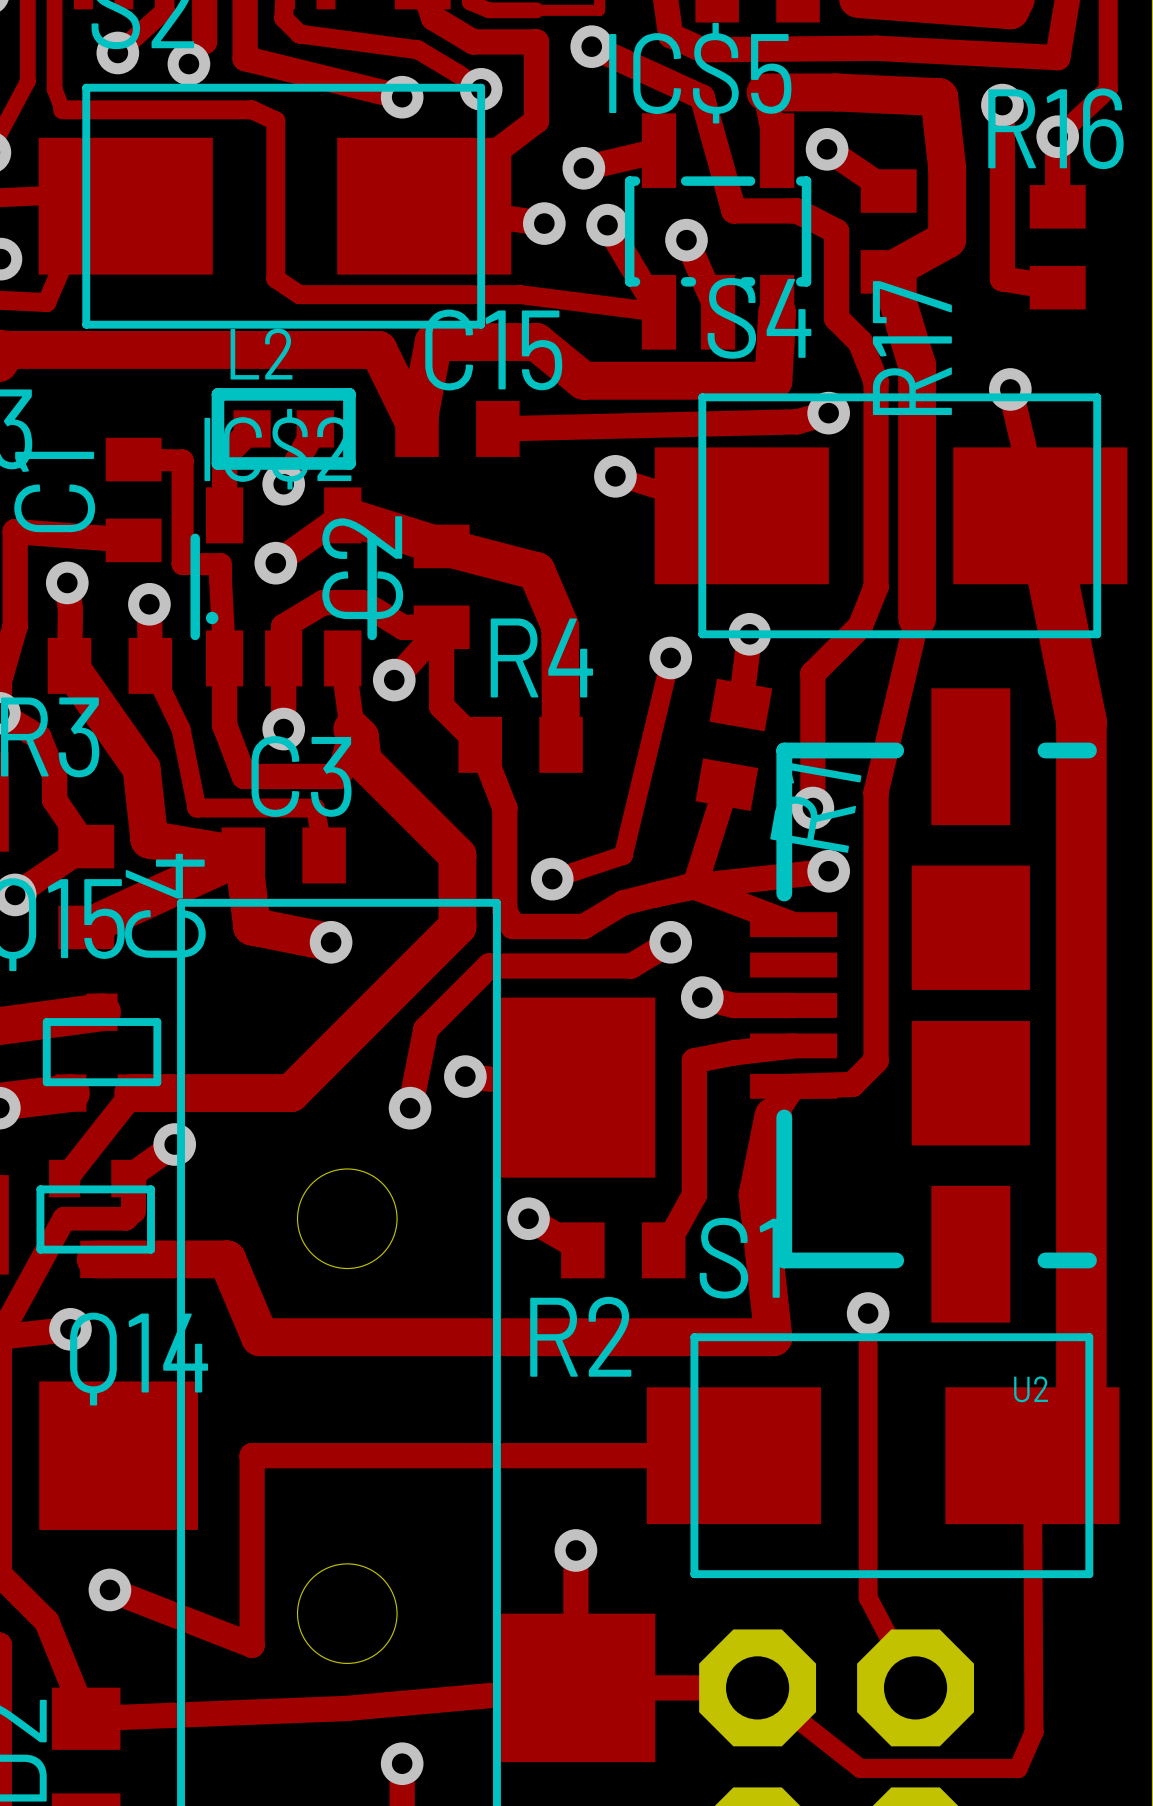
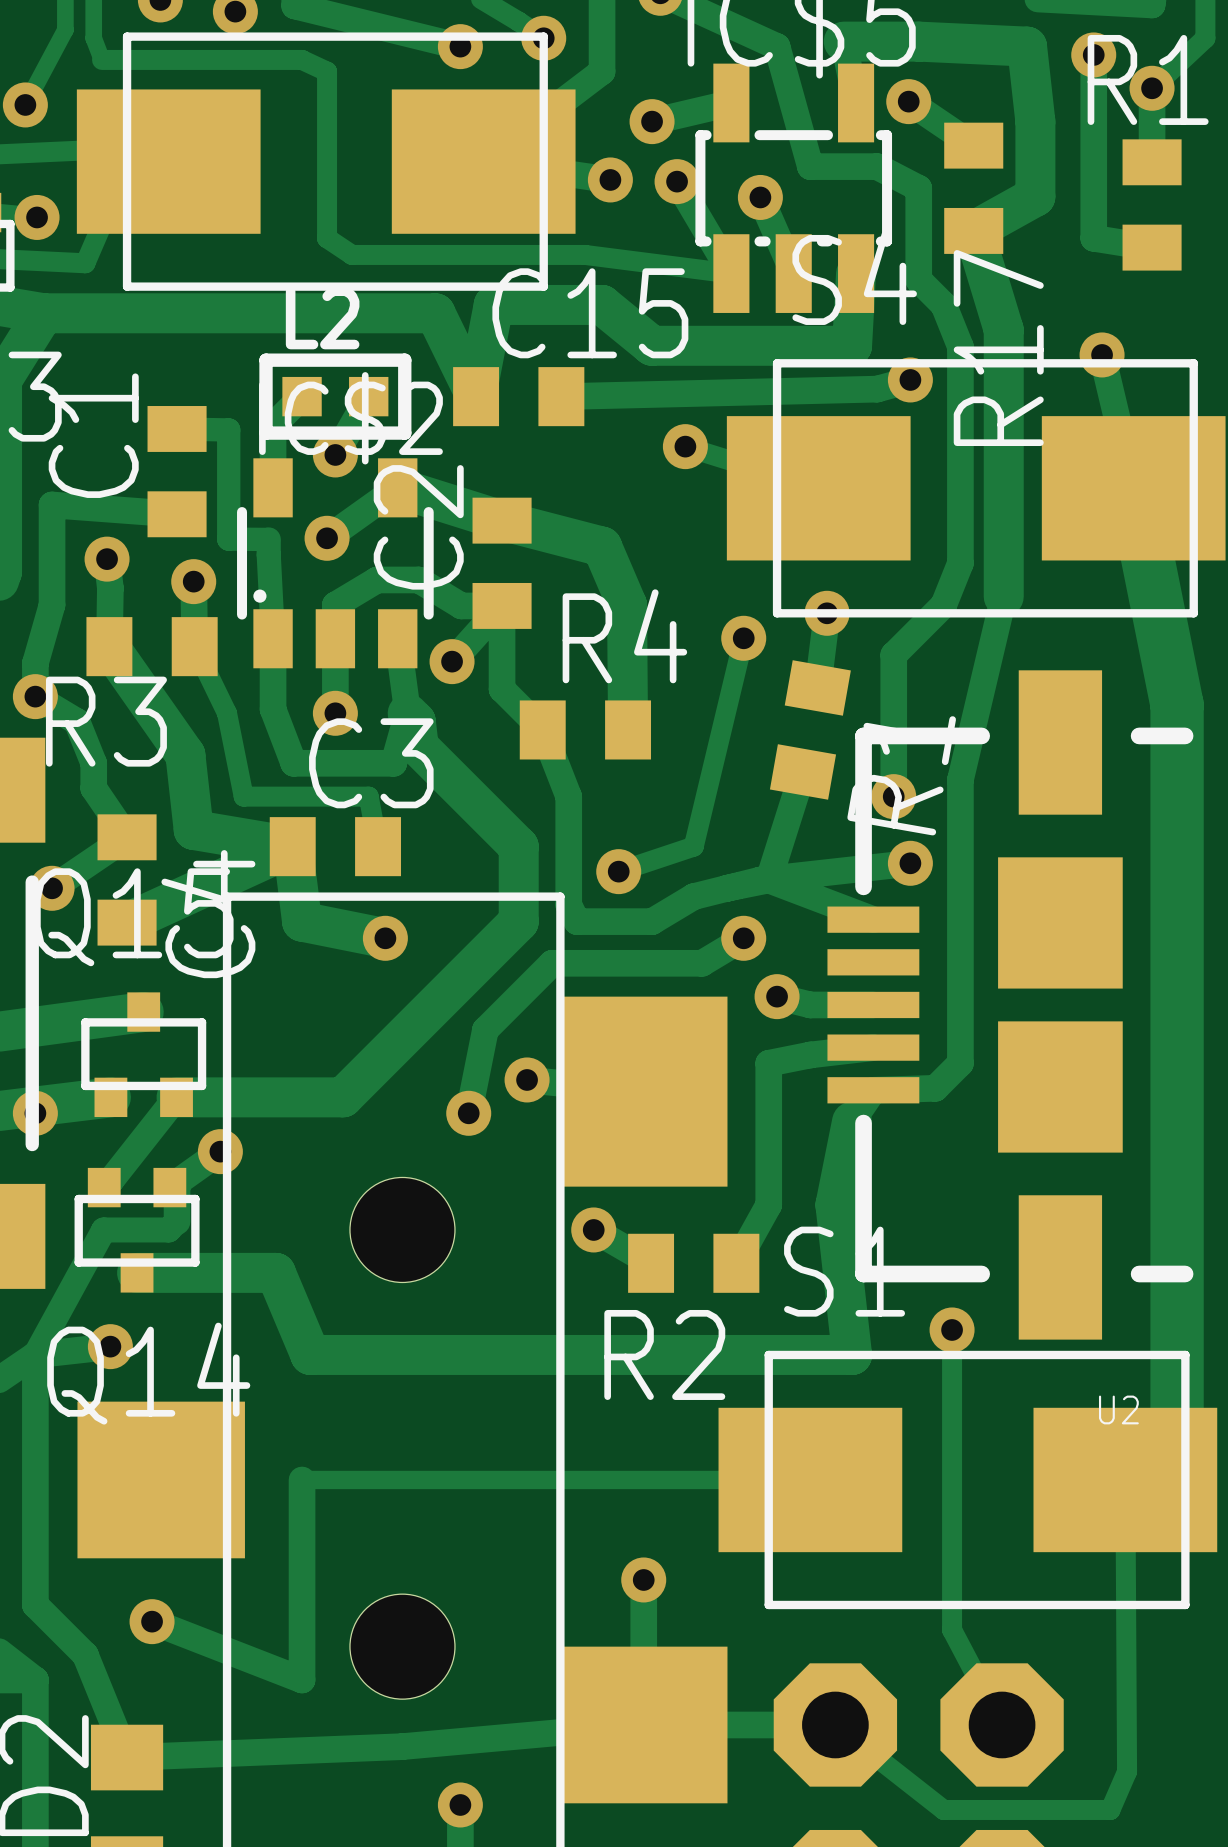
track width: thick (252, 1455) (733, 1455) -> thin (302, 1479) (810, 1479)

